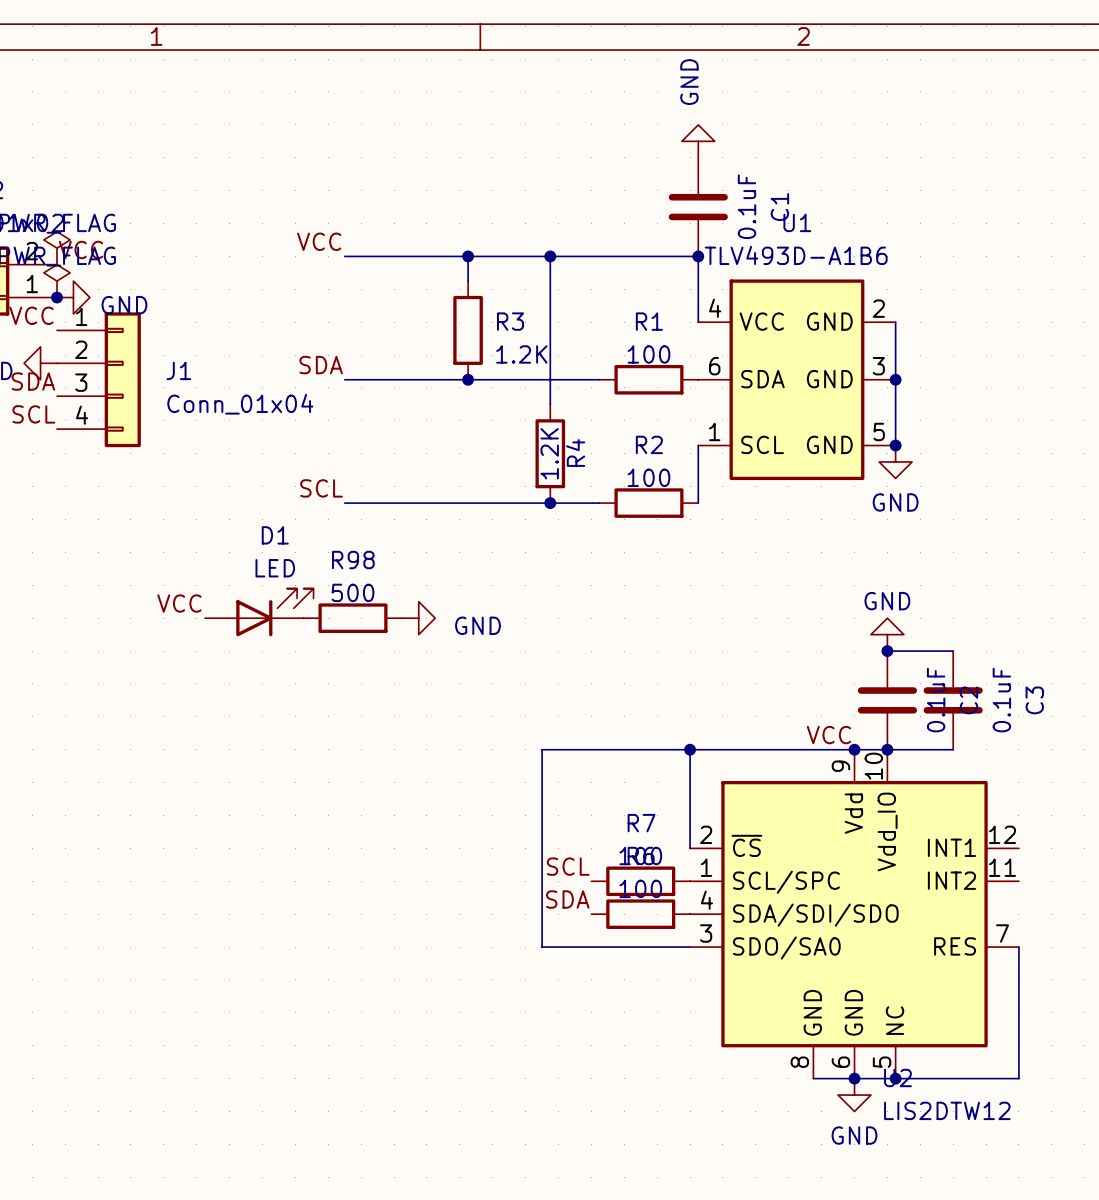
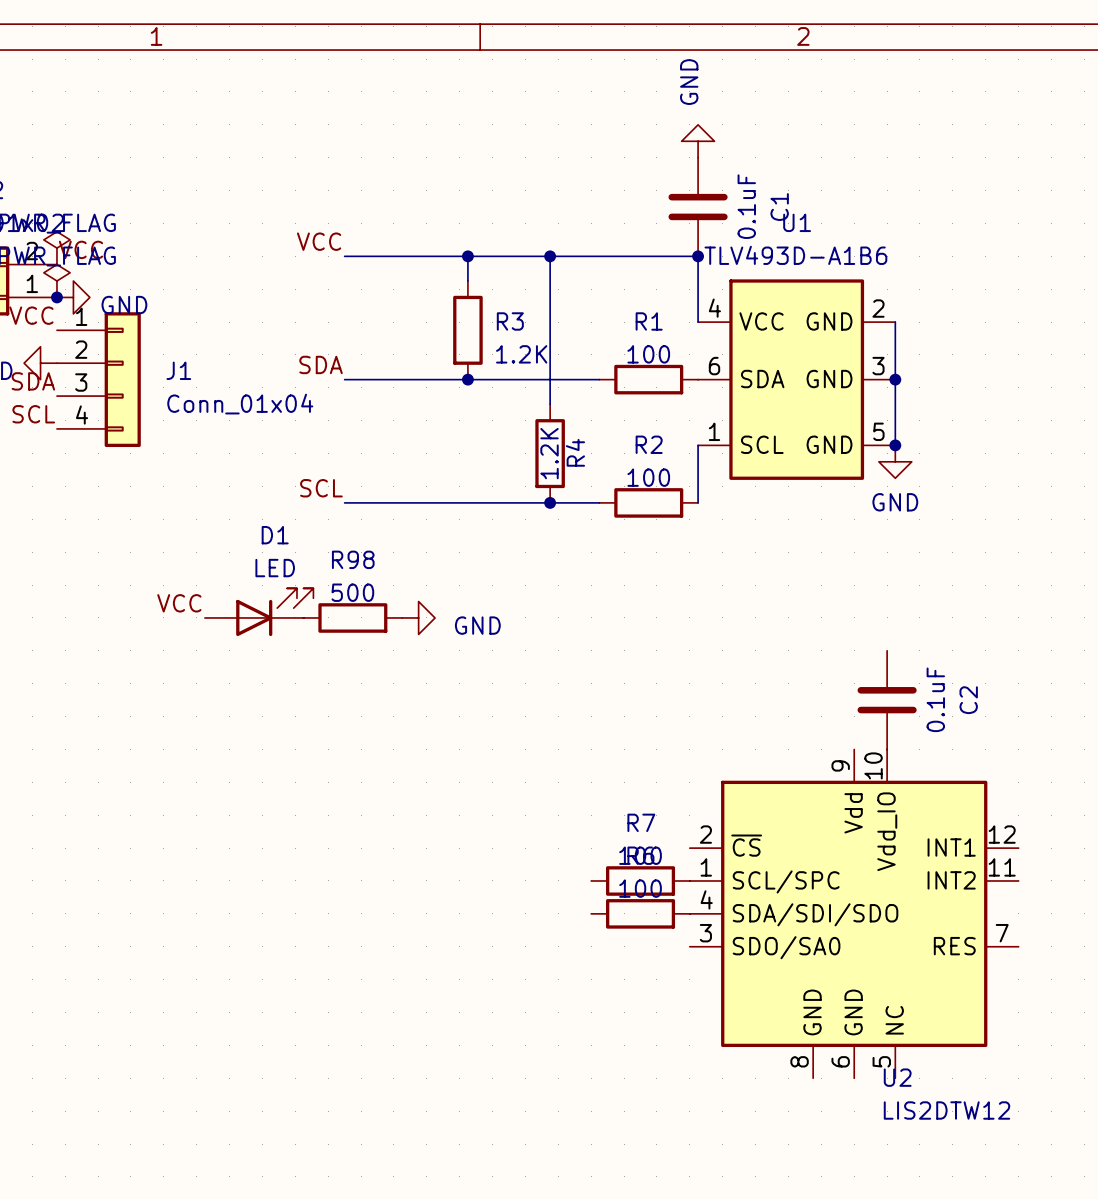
power symbol: GND (887, 634) -> none
wire: (887, 651) (953, 651) -> none
junction: (887, 651) -> none
C3: 0.1uF (953, 700) -> none
label: VCC (828, 735) -> none
wire: (690, 749) (690, 848) -> none
junction: (690, 749) -> none
junction: (854, 749) -> none
junction: (887, 749) -> none
wire: (953, 749) (542, 749) (542, 947) (690, 947) -> none
label: SCL (568, 866) -> none
label: SDA (567, 899) -> none
wire: (1018, 947) (1018, 1078) (813, 1078) -> none
junction: (854, 1078) -> none
junction: (895, 1078) -> none
power symbol: GND (854, 1095) -> none

